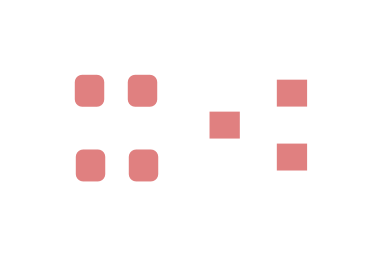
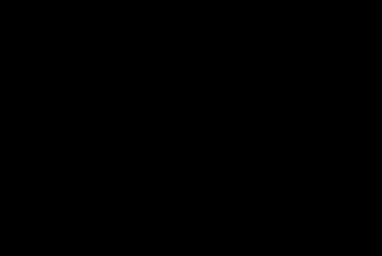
part: (116, 90) -> none
part: (258, 125) -> none
part: (117, 165) -> none

